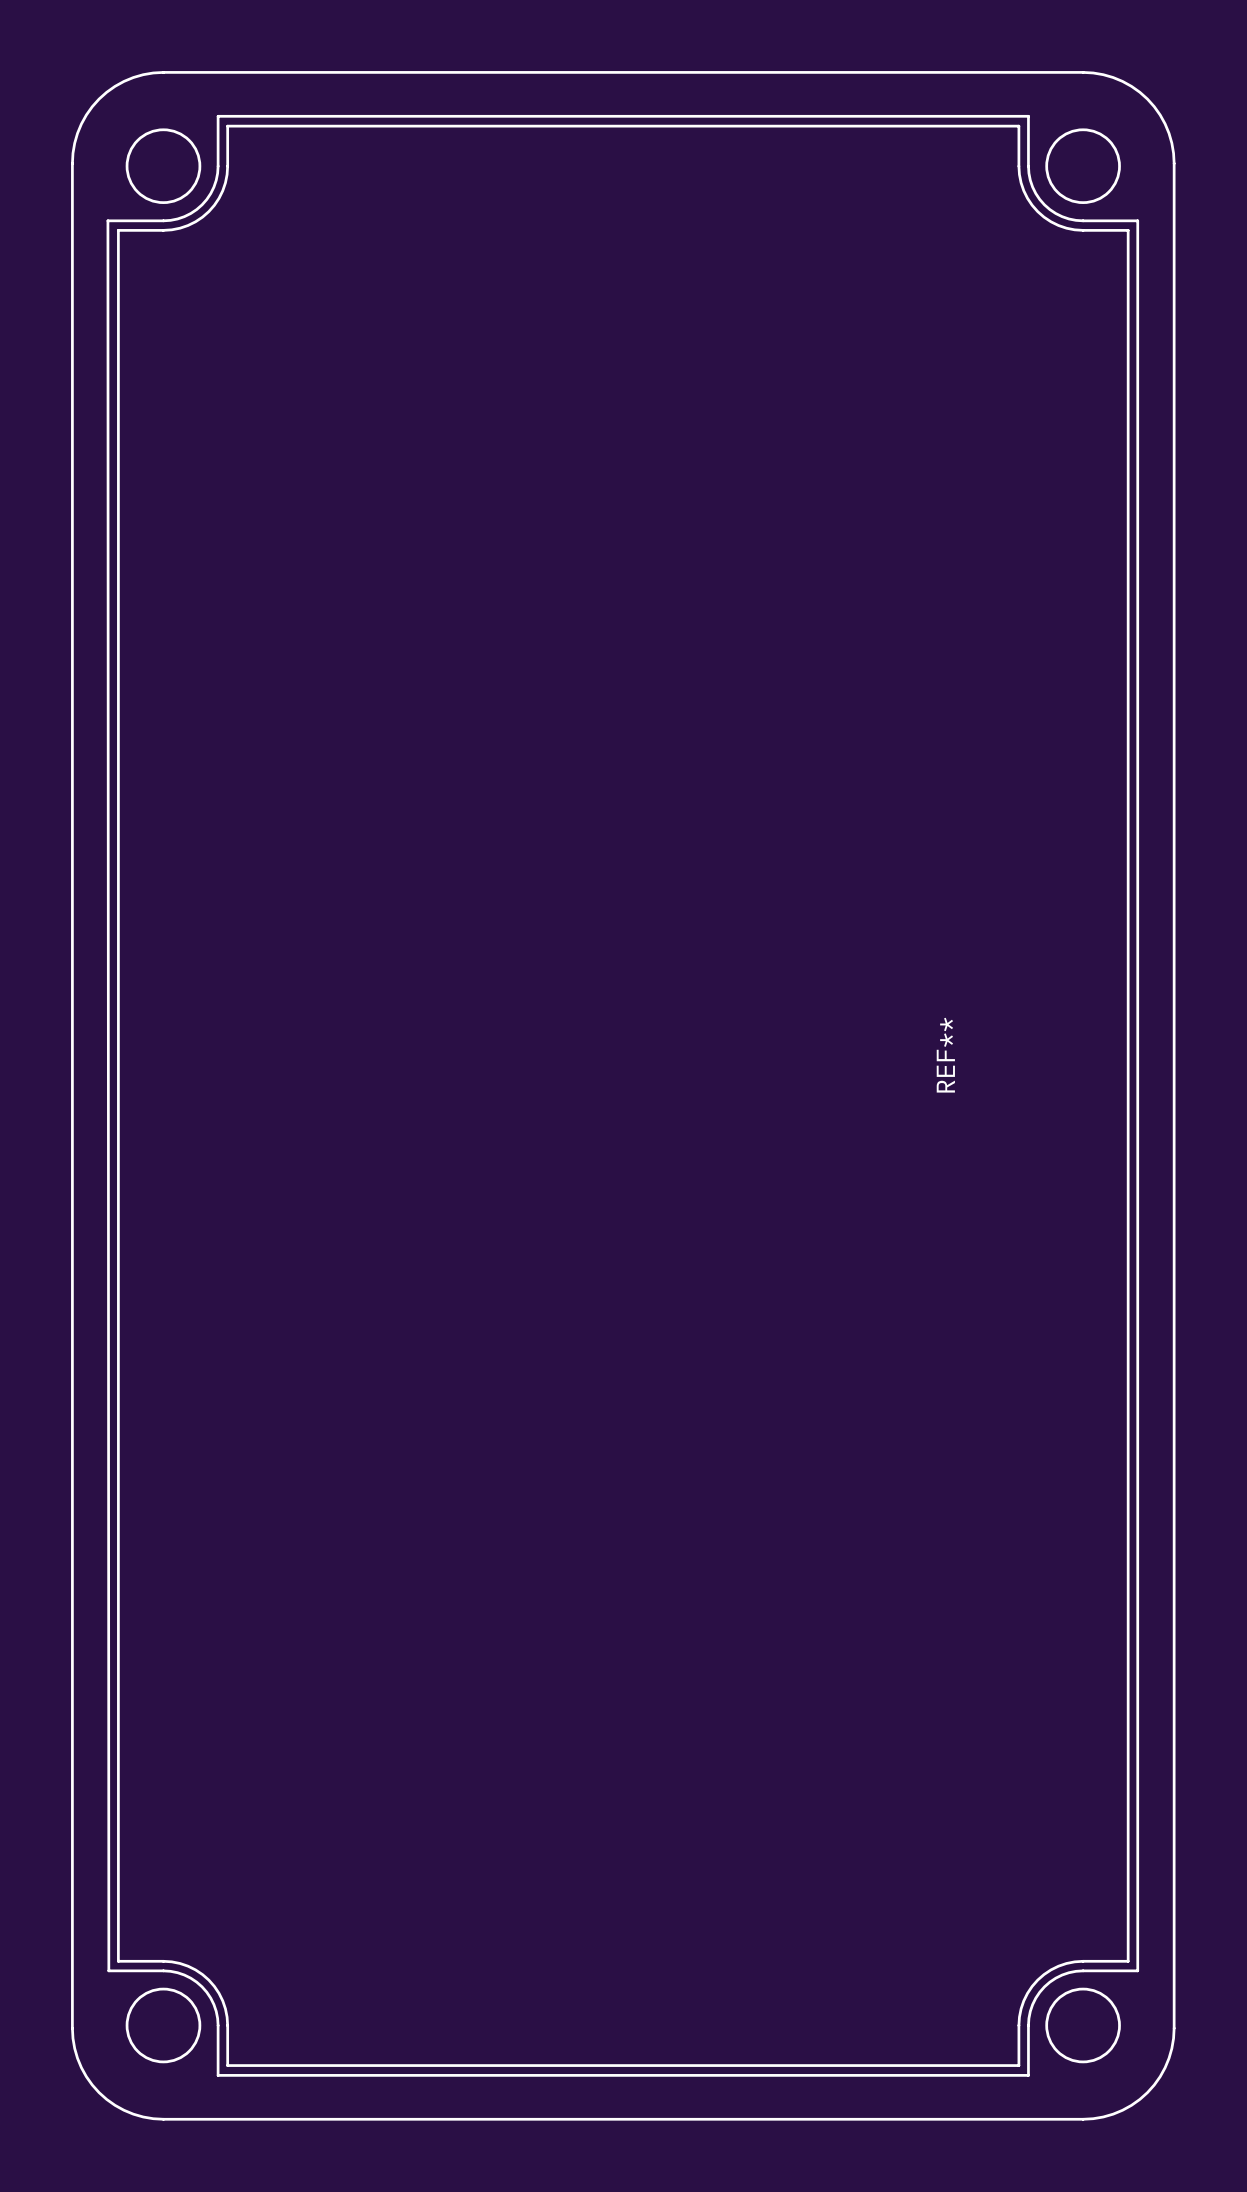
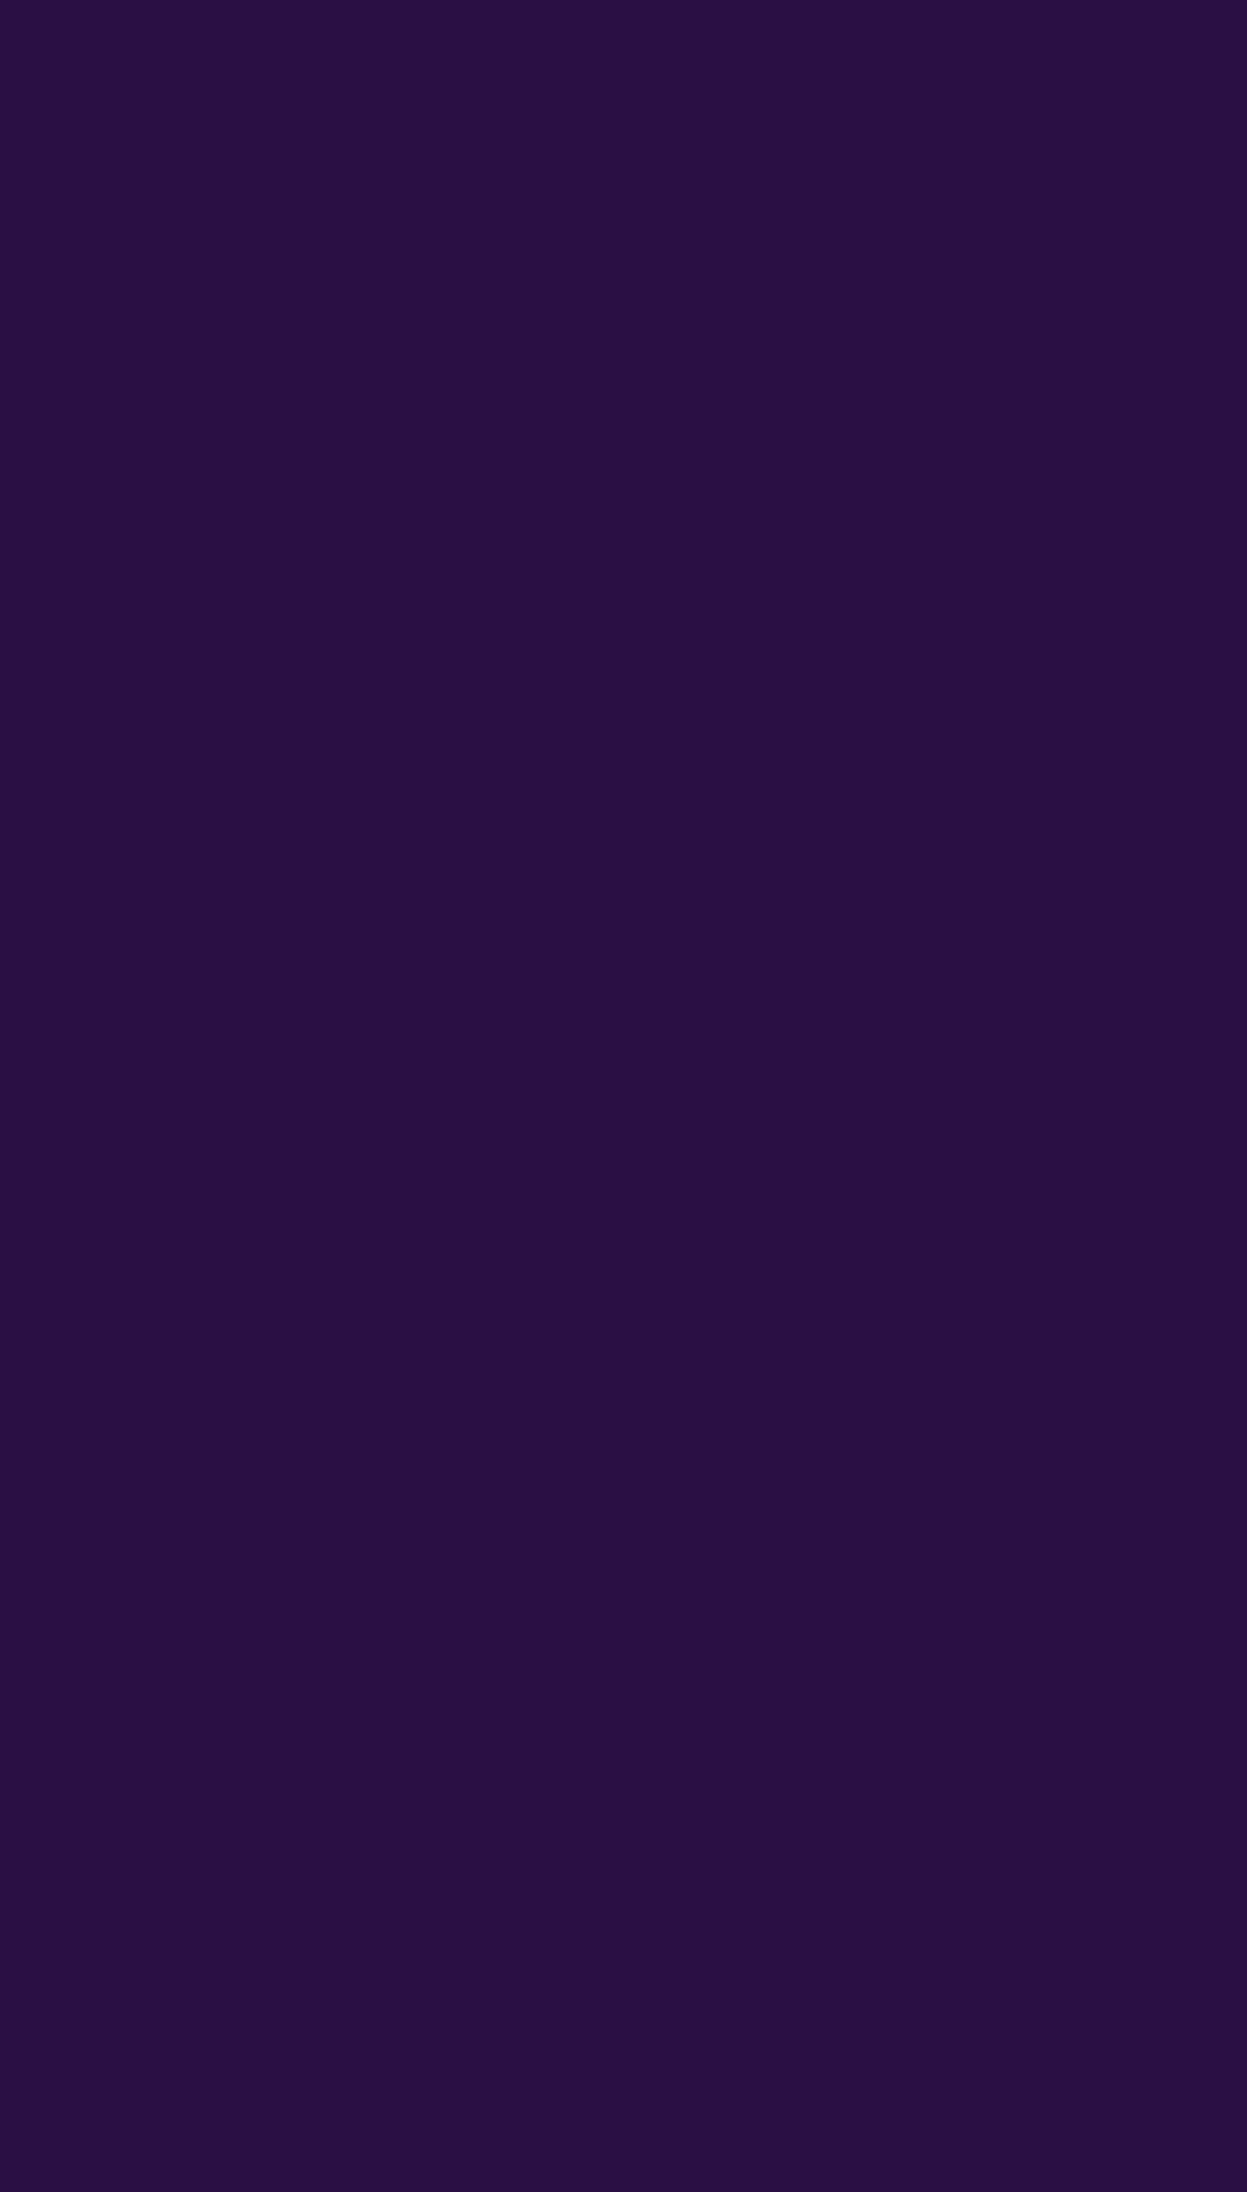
REF**: (623, 1095) -> none

